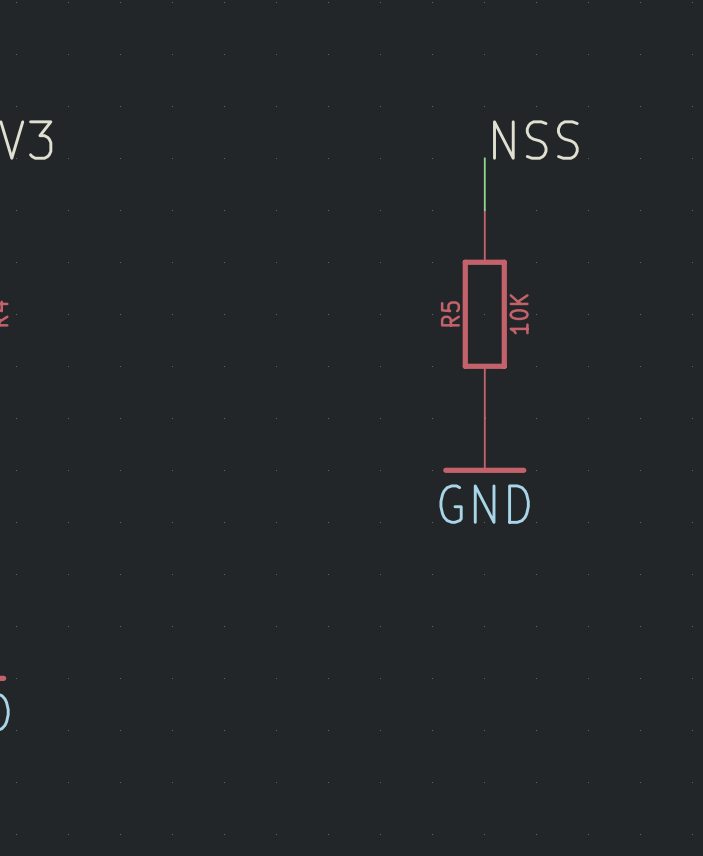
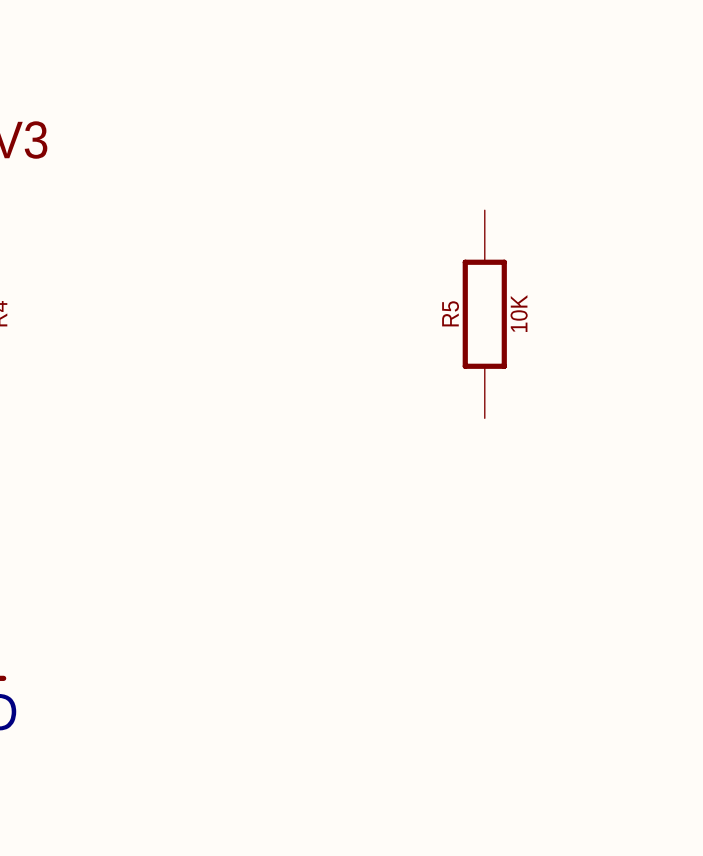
label: NSS (535, 140) -> none
wire: (484, 158) (484, 210) -> none
power symbol: GND (484, 445) -> none

